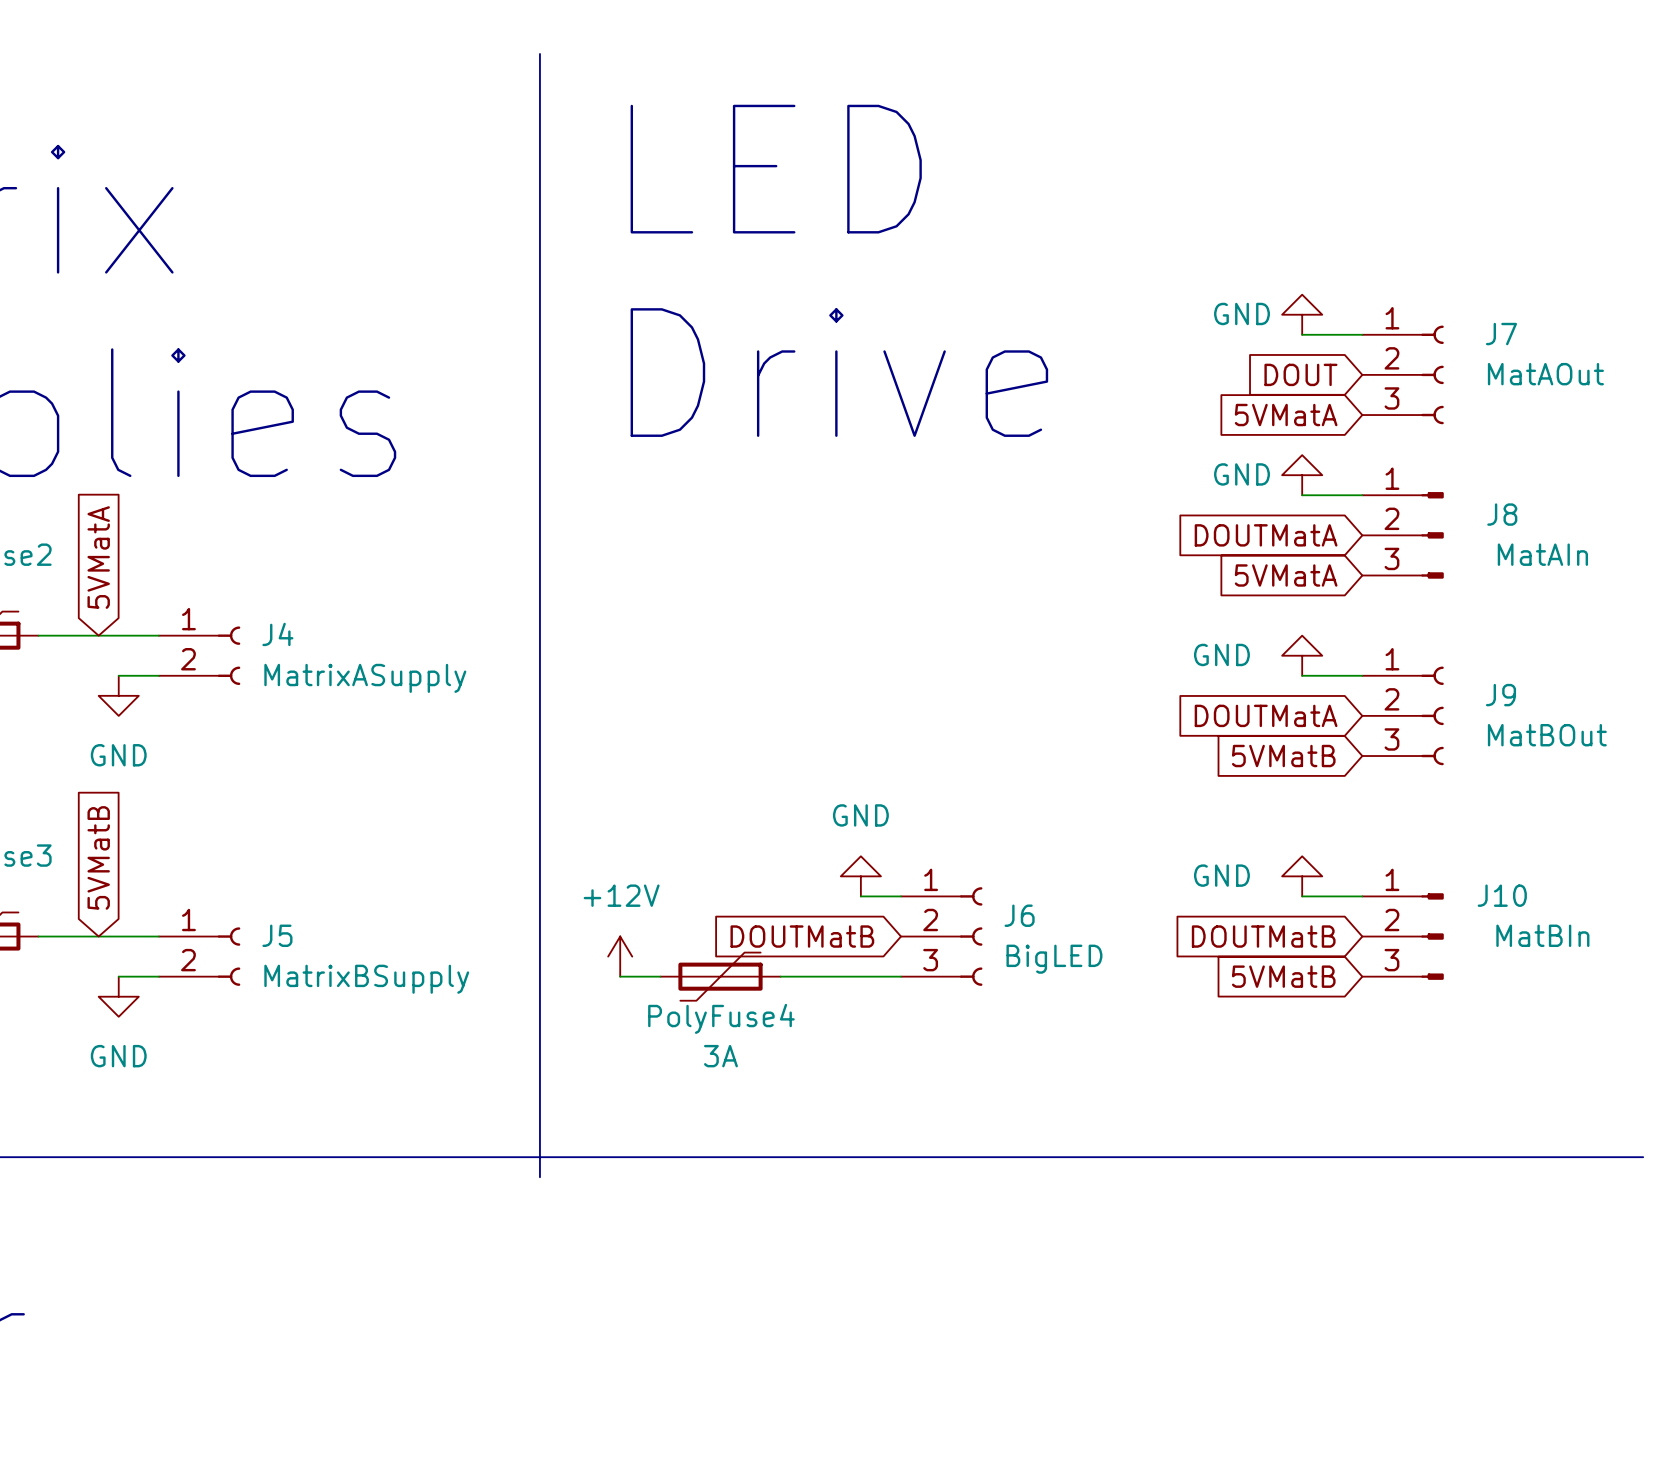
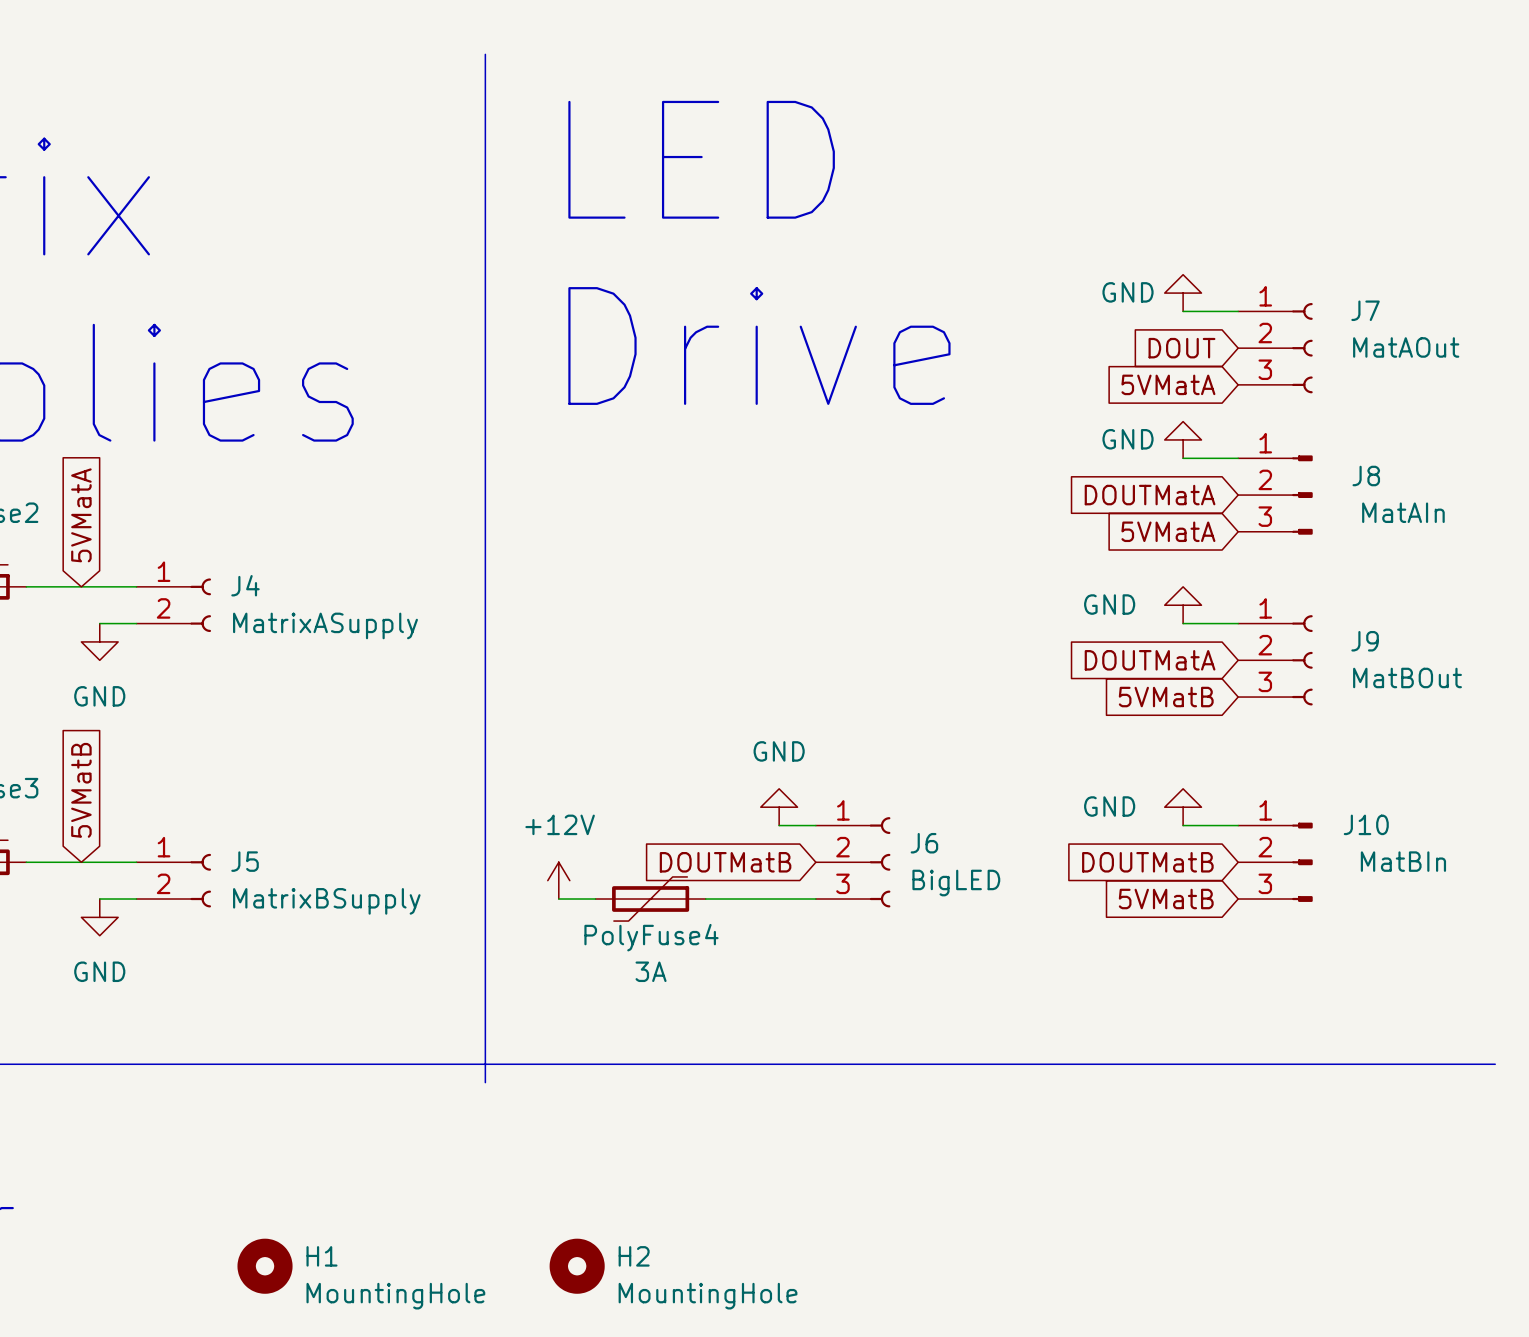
H1: none -> MountingHole (265, 1266)
H2: none -> MountingHole (577, 1266)

